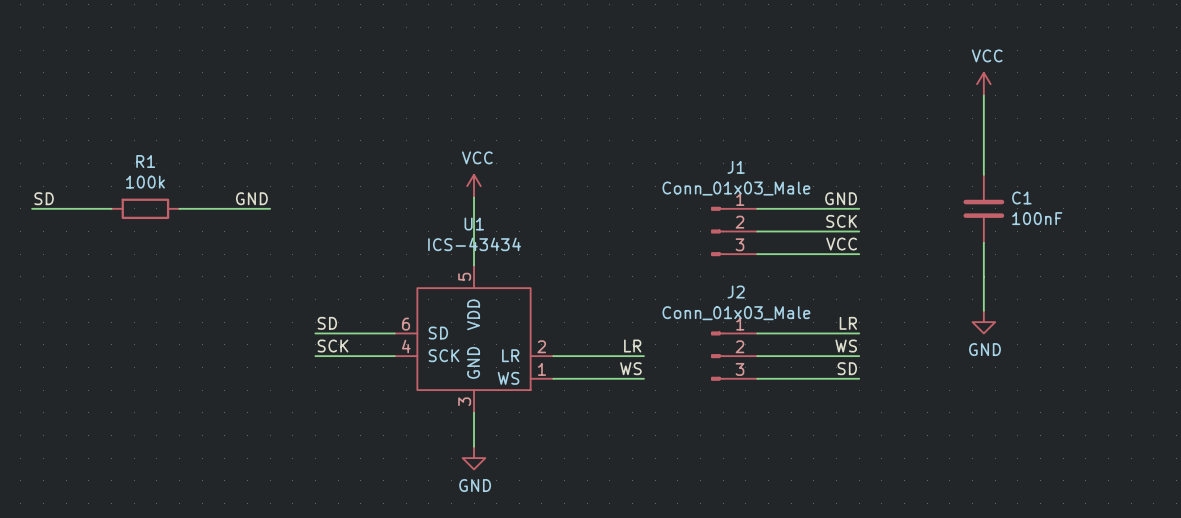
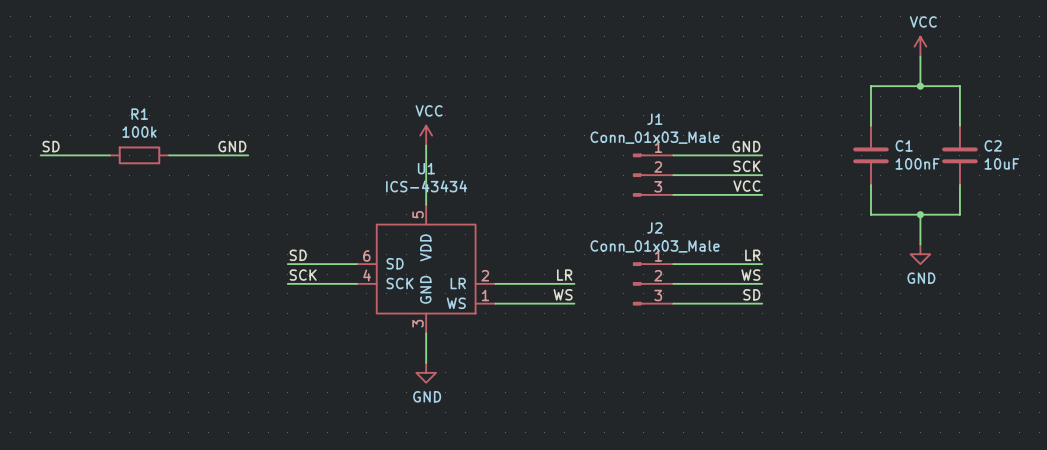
power symbol position: VCC (983, 84) -> VCC (920, 46)
wire: (983, 95) (983, 129) -> (959, 125) (959, 86) (870, 86)
wire: none -> (920, 56) (920, 86)
junction: none -> (920, 86)
C2: none -> 10uF (959, 155)
wire: (983, 276) (983, 310) -> (870, 214) (959, 214) (959, 185)
wire: none -> (920, 214) (920, 244)
junction: none -> (920, 214)
power symbol position: GND (983, 322) -> GND (920, 254)

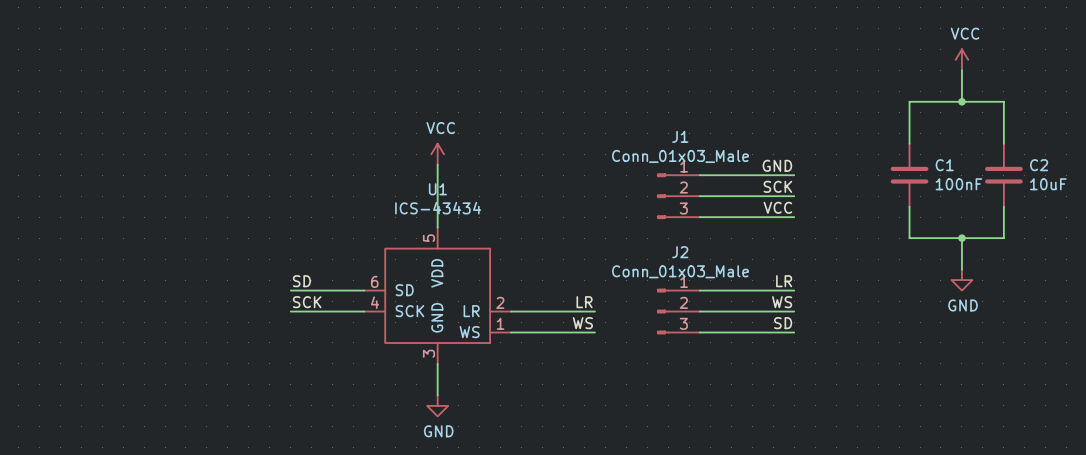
label: SD (51, 146) -> none
label: GND (232, 146) -> none
wire: (40, 155) (109, 155) -> none
R1: 100k (139, 155) -> none
wire: (169, 155) (248, 155) -> none

